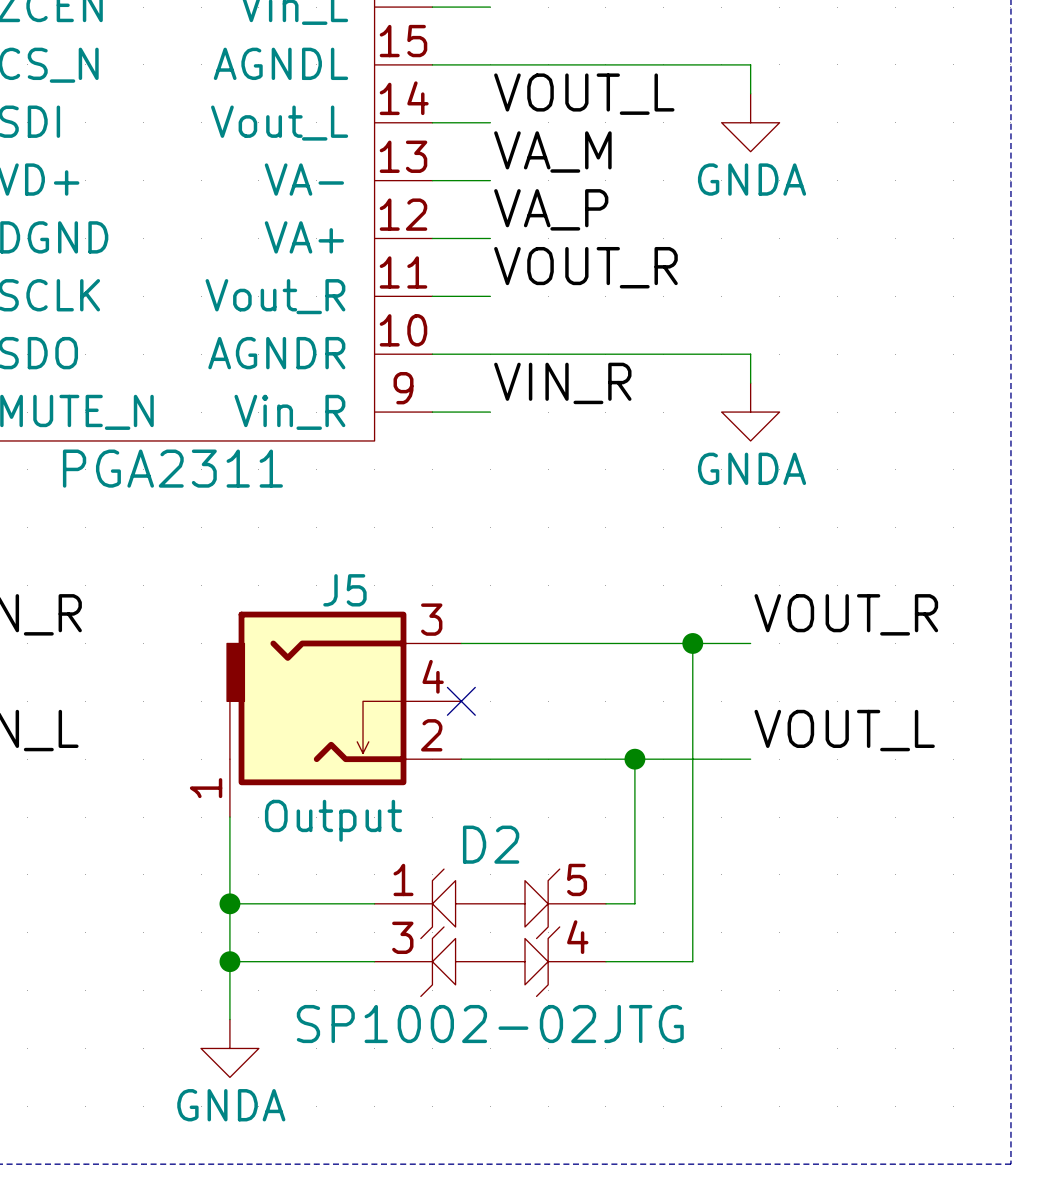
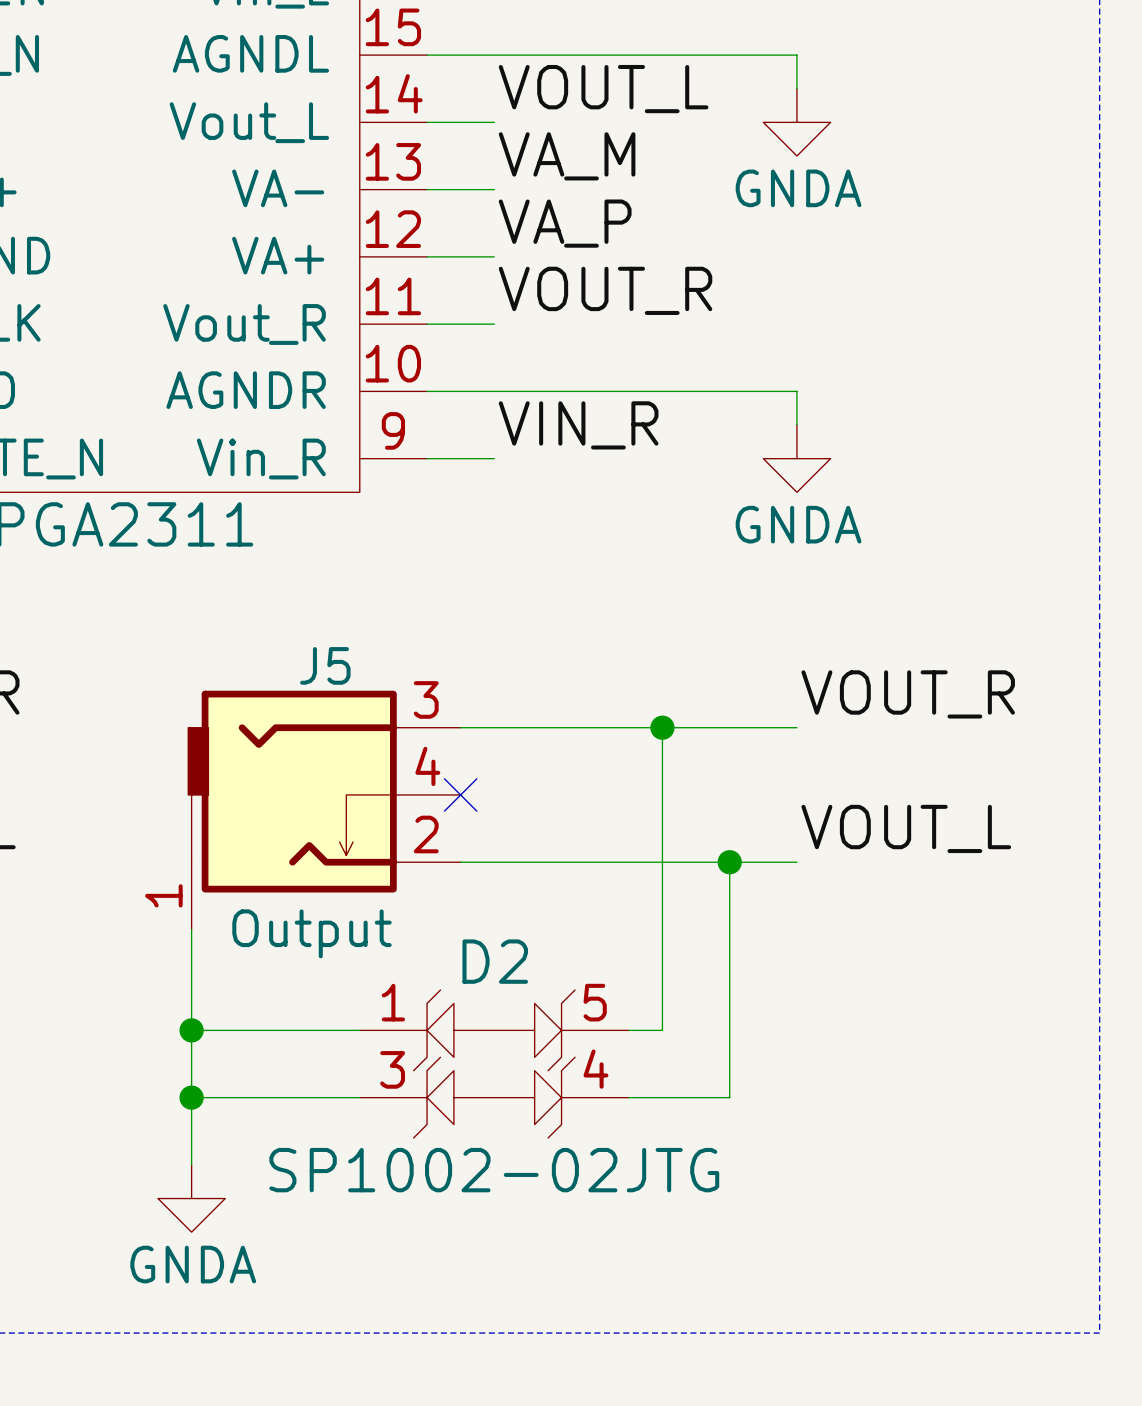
junction: none -> (662, 727)
wire: (692, 643) (692, 759) -> (662, 727) (662, 862)
junction: (692, 643) -> none
junction: (634, 759) -> none
junction: none -> (729, 862)

